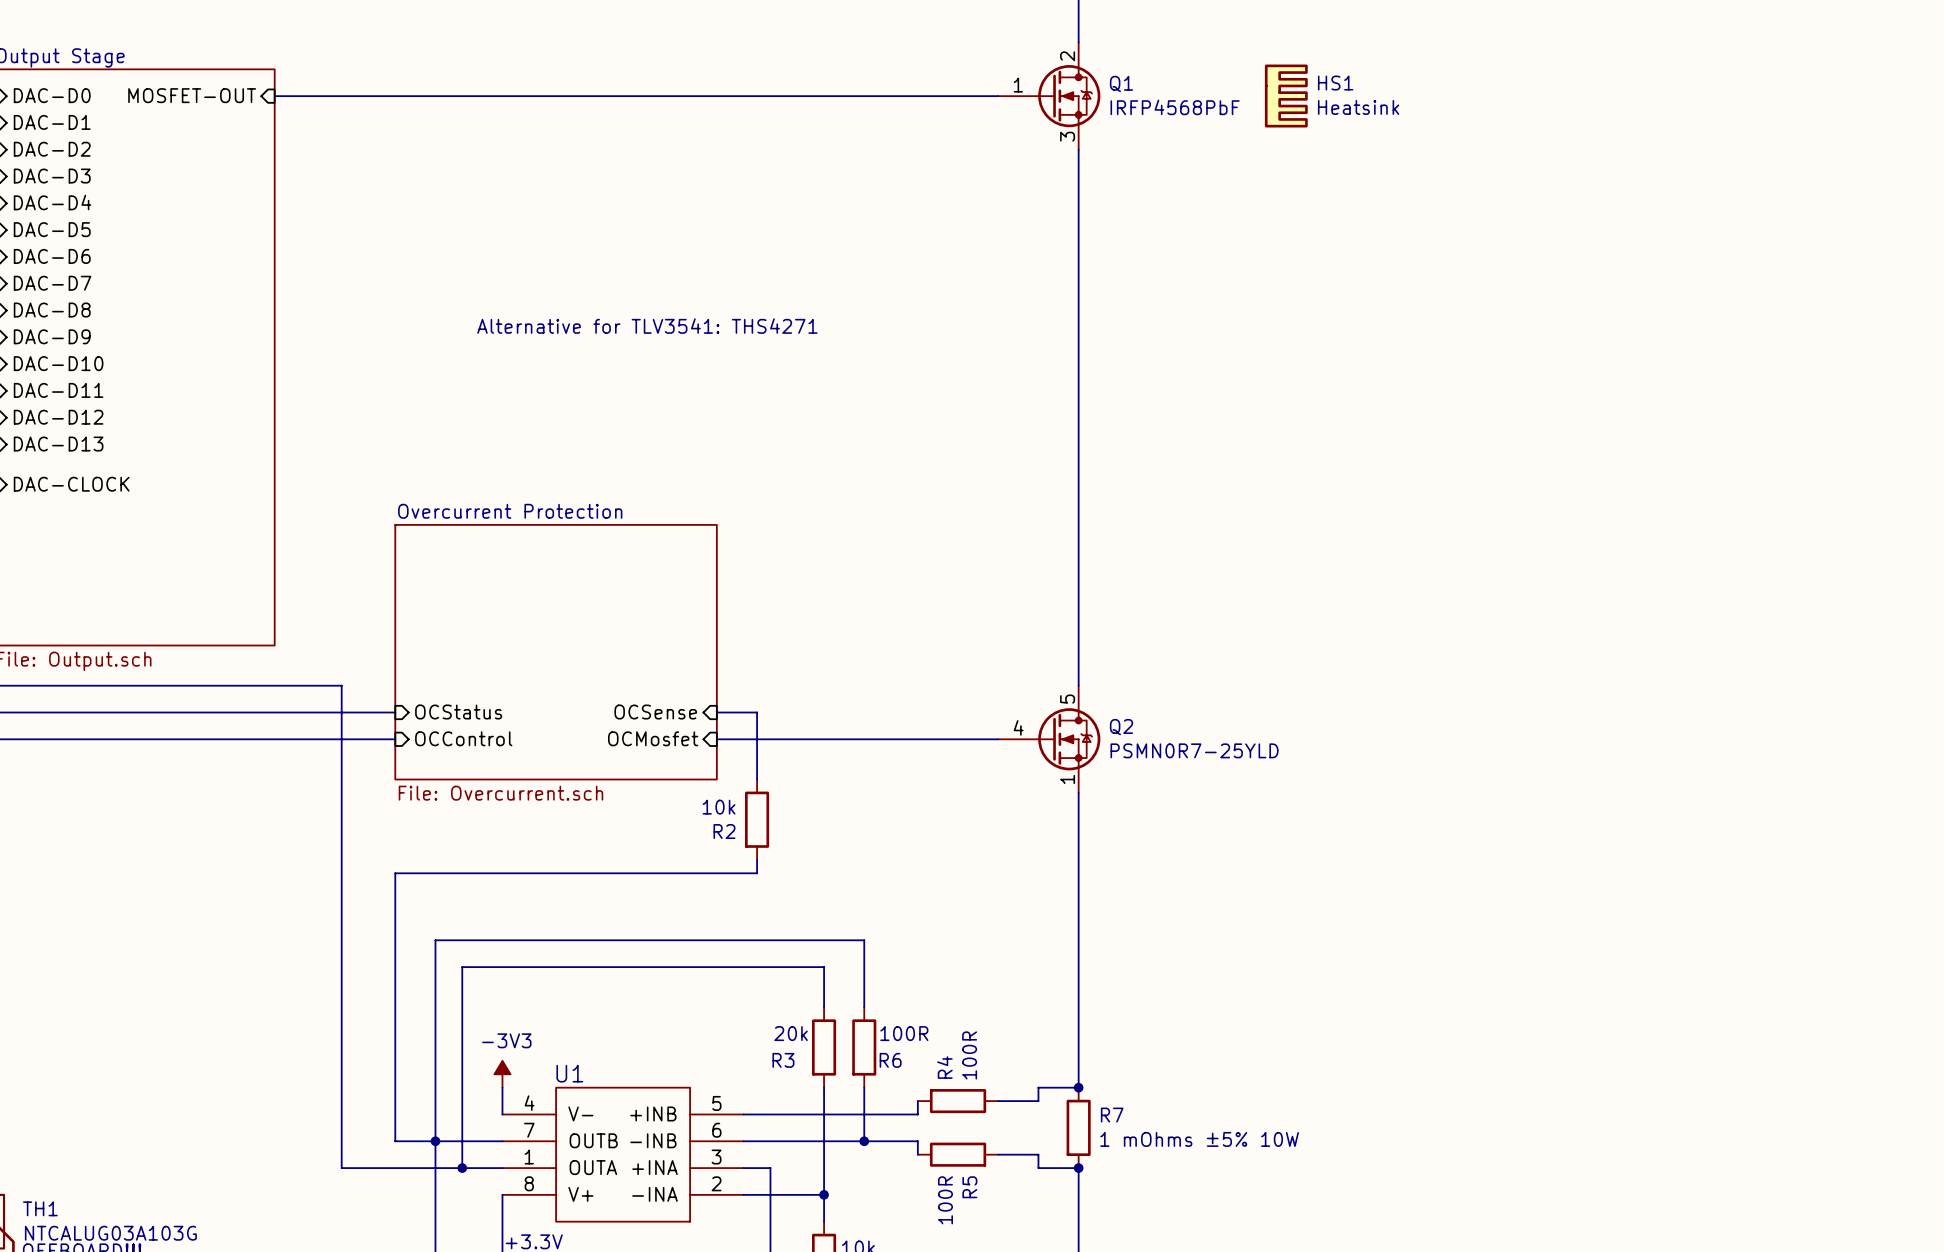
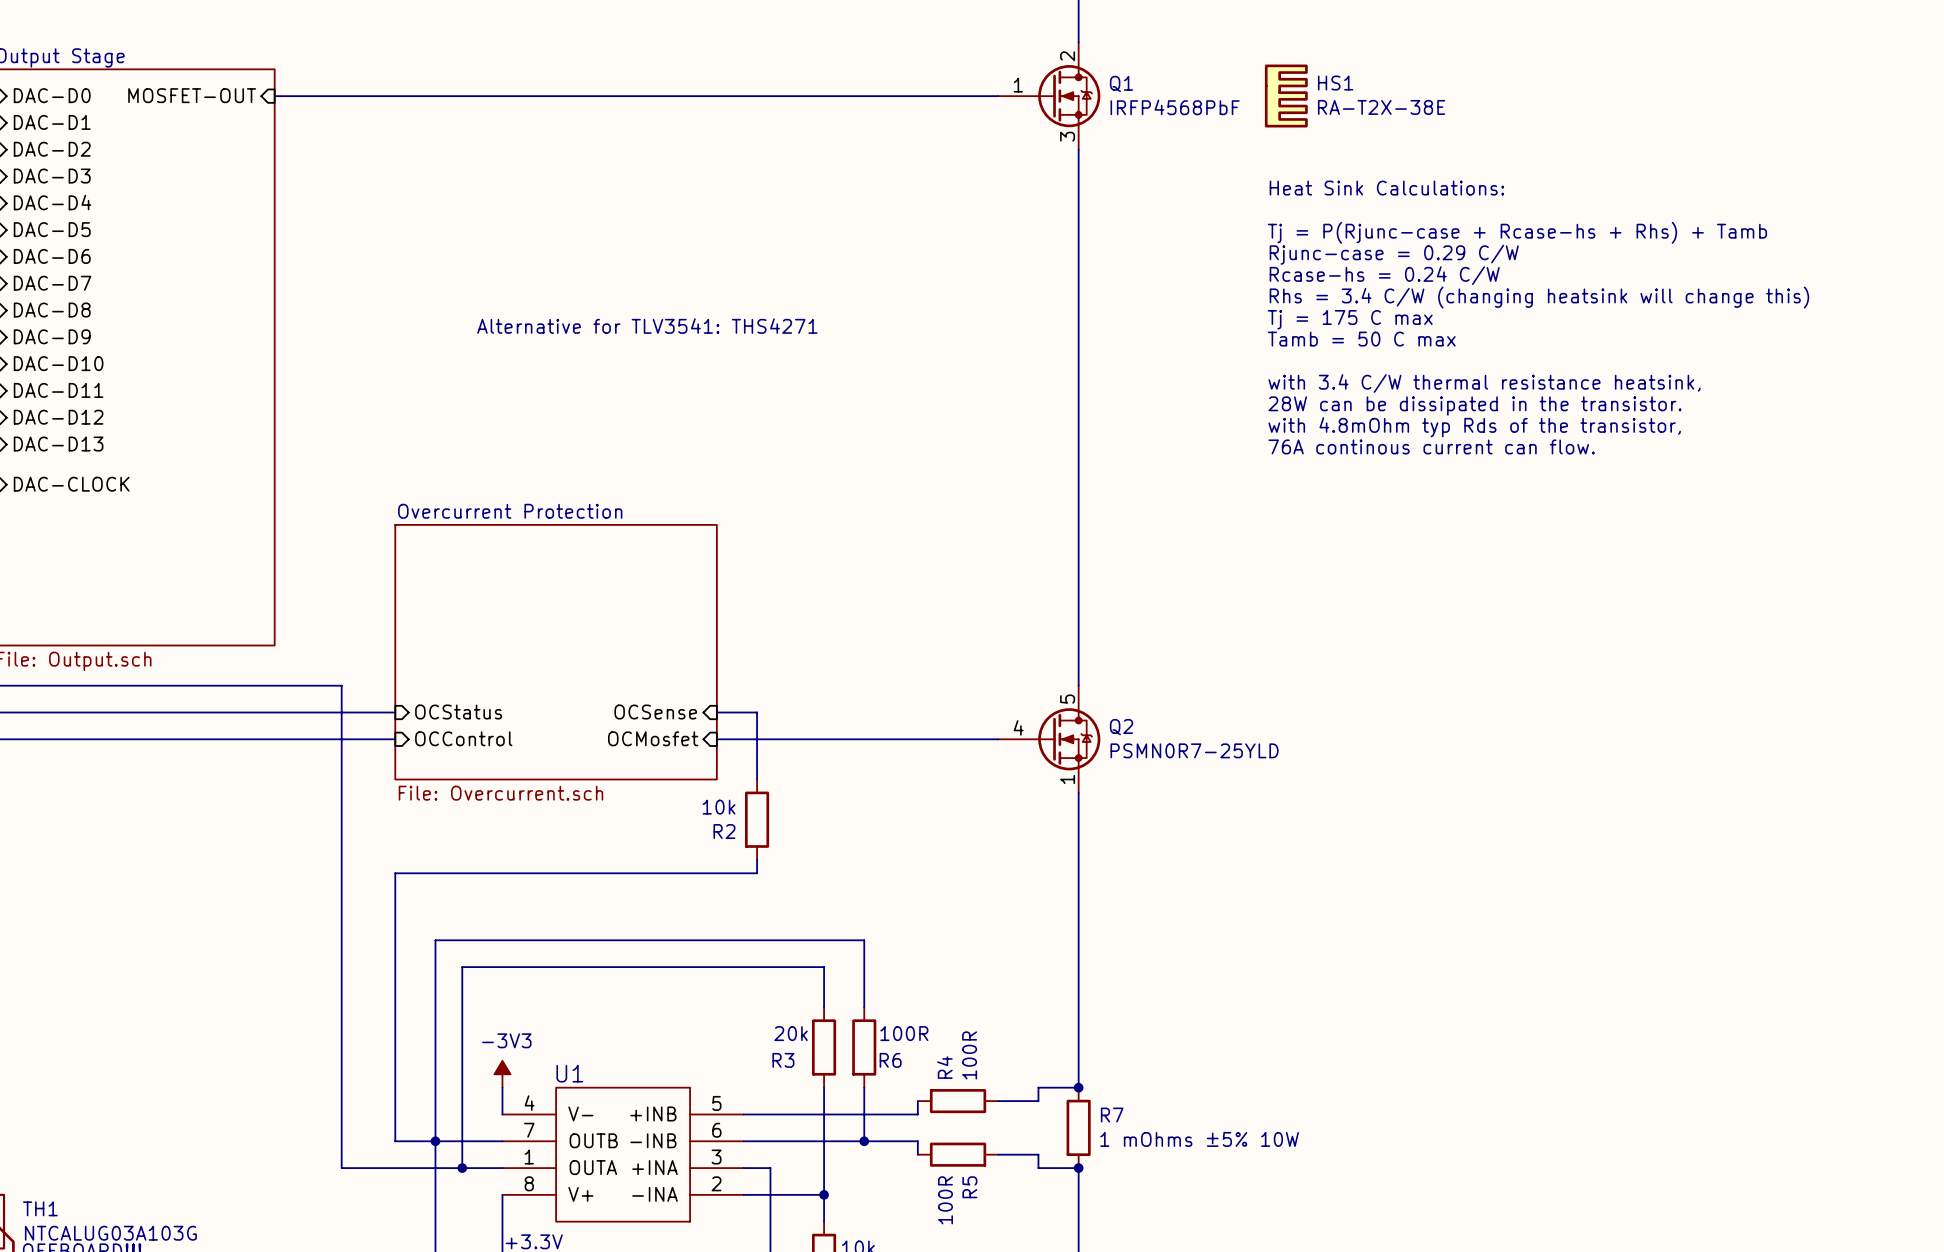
HS1 value: Heatsink (1358, 107) -> RA-T2X-38E (1381, 107)
text: none -> Heat Sink Calculations: (1386, 188)
text: none -> Tj = P(Rjunc-case + Rcase-hs + Rhs) + Tamb (1517, 232)
text: none -> Rjunc-case = 0.29 C/W (1394, 254)
text: none -> Rcase-hs = 0.24 C/W (1384, 275)
text: none -> Rhs = 3.4 C/W (changing heatsink will change this) (1539, 297)
text: none -> Tj = 175 C max (1350, 319)
text: none -> Tamb = 50 C max (1361, 339)
text: none -> with 3.4 C/W thermal resistance heatsink, (1484, 383)
text: none -> 28W can be dissipated in the transistor. (1474, 406)
text: none -> with 4.8mOhm typ Rds of the transistor, (1474, 427)
text: none -> 76A continous current can flow. (1431, 446)

